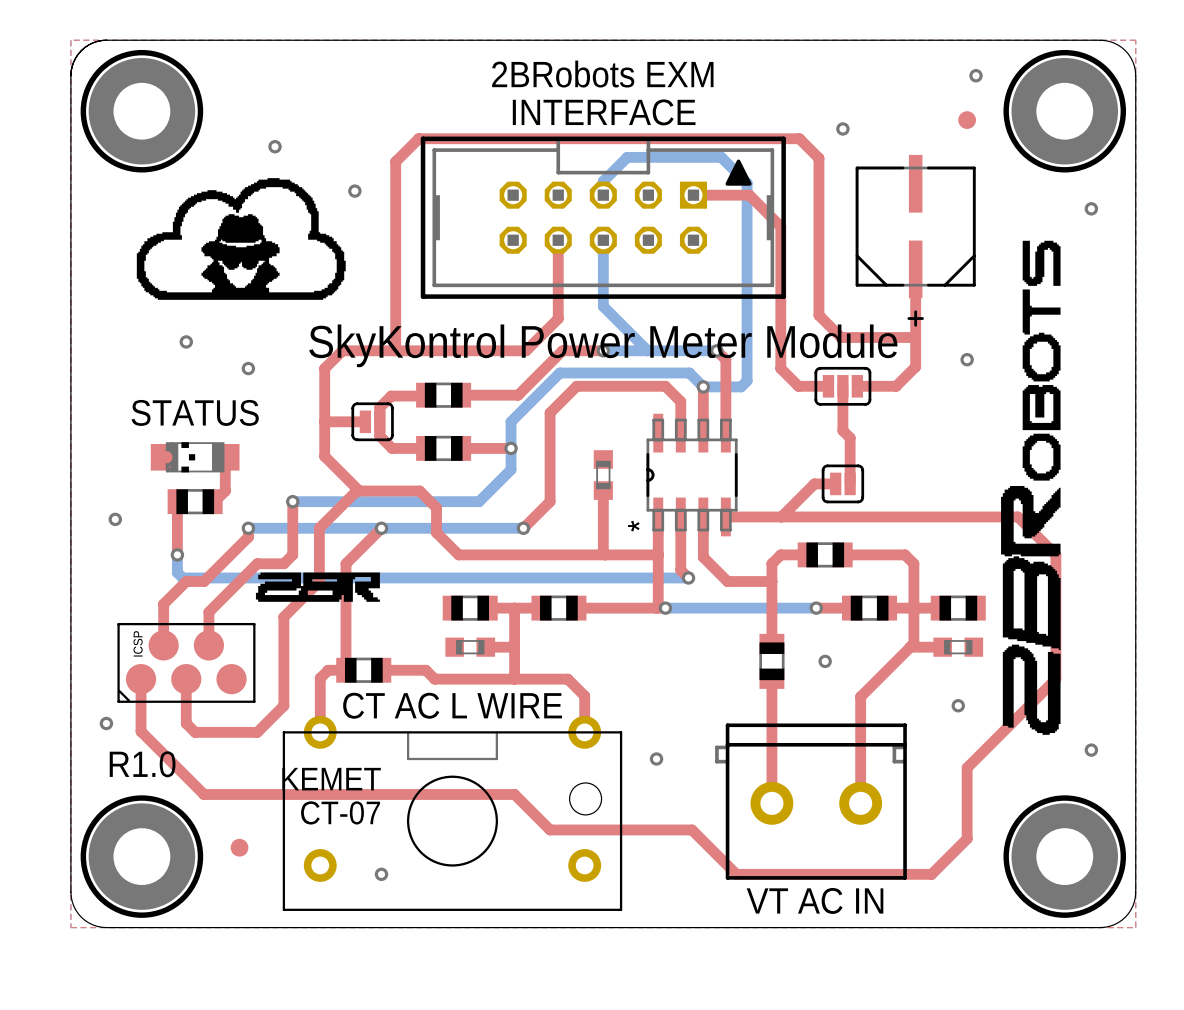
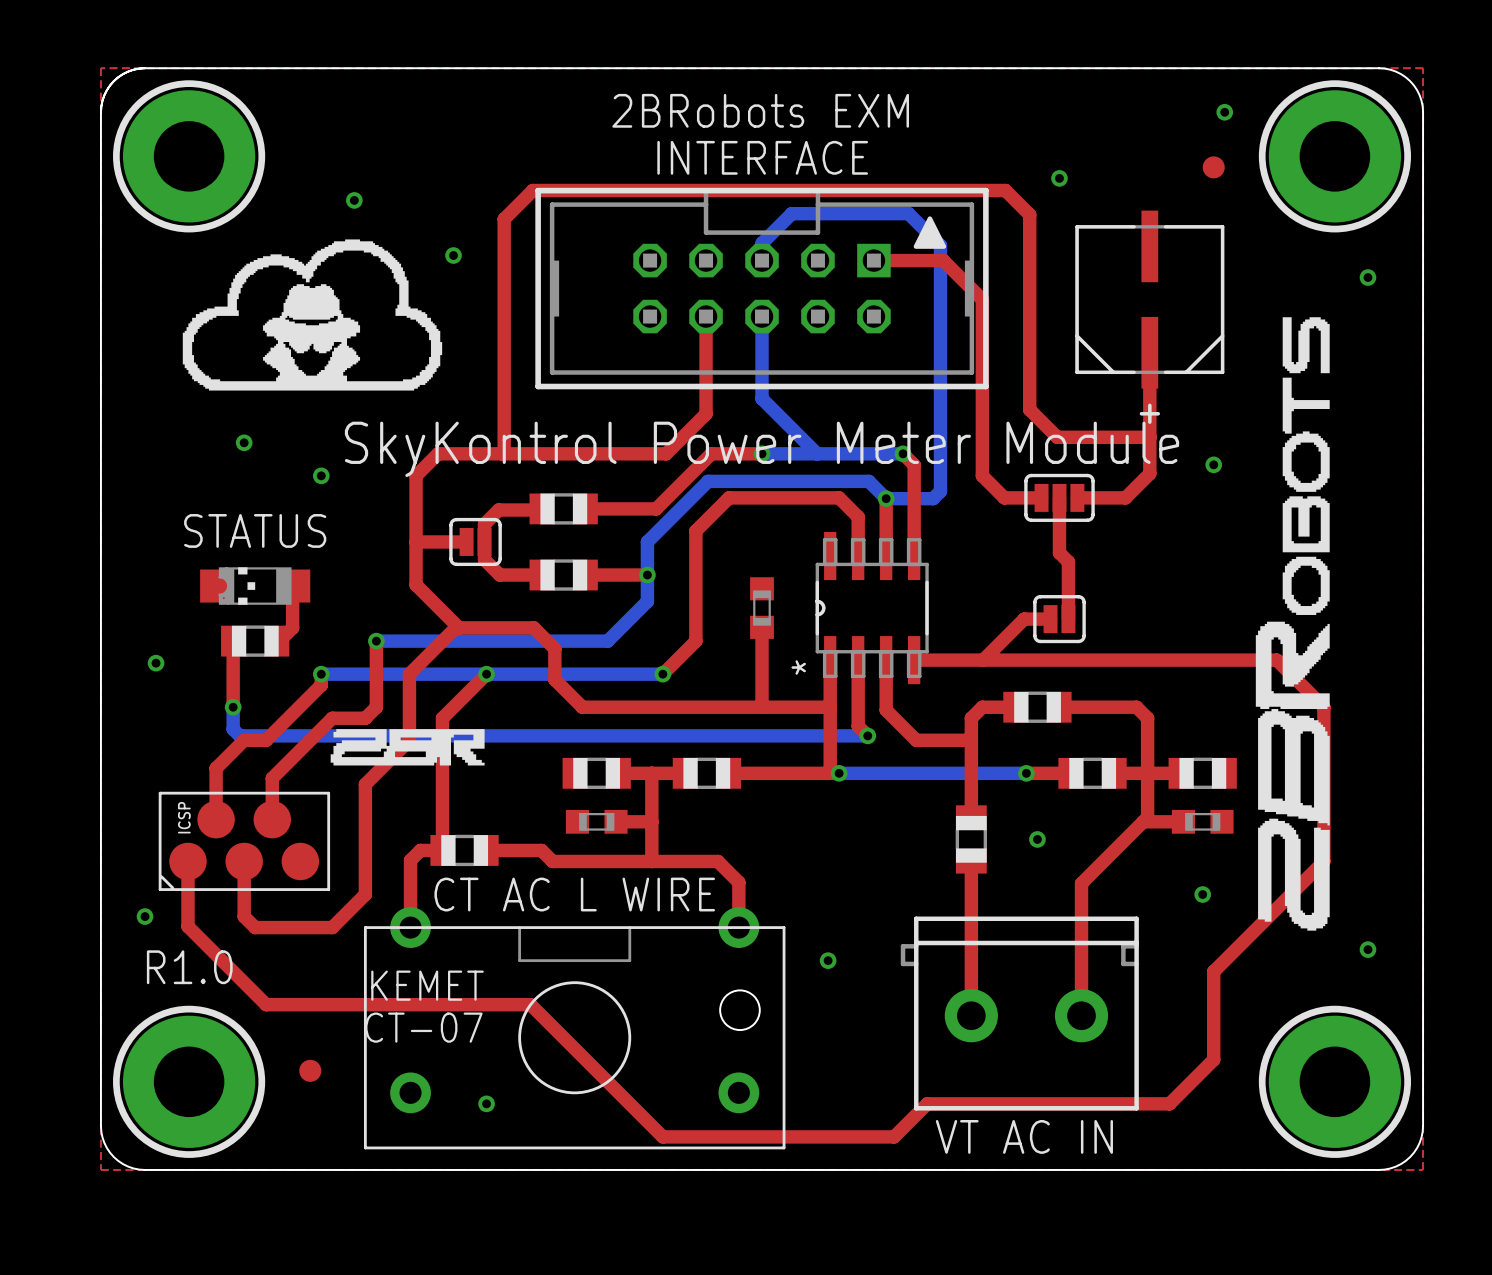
top track: (416, 794) (514, 794) (550, 829) (692, 829) (736, 874) -> (530, 1004) (662, 1136) (894, 1136) (927, 1103)

